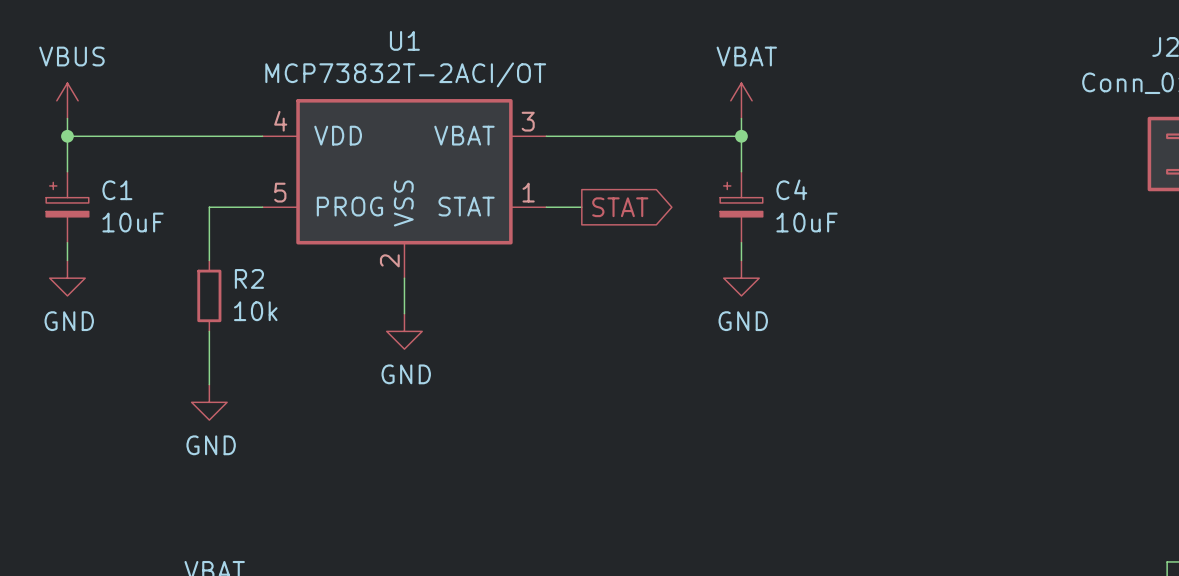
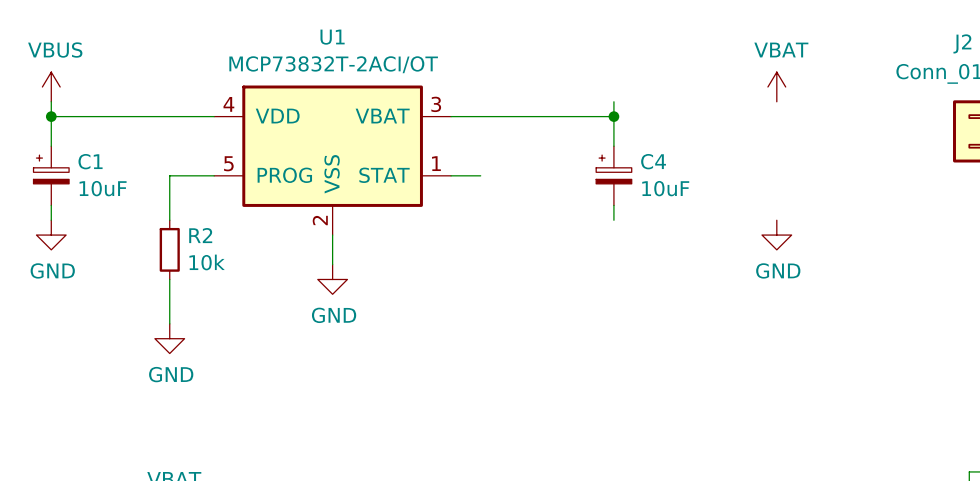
power symbol: VBAT (741, 100) -> none
power symbol: none -> VBAT (776, 86)
global label: STAT (620, 207) -> none
power symbol: GND (741, 278) -> none
power symbol: none -> GND (776, 235)

